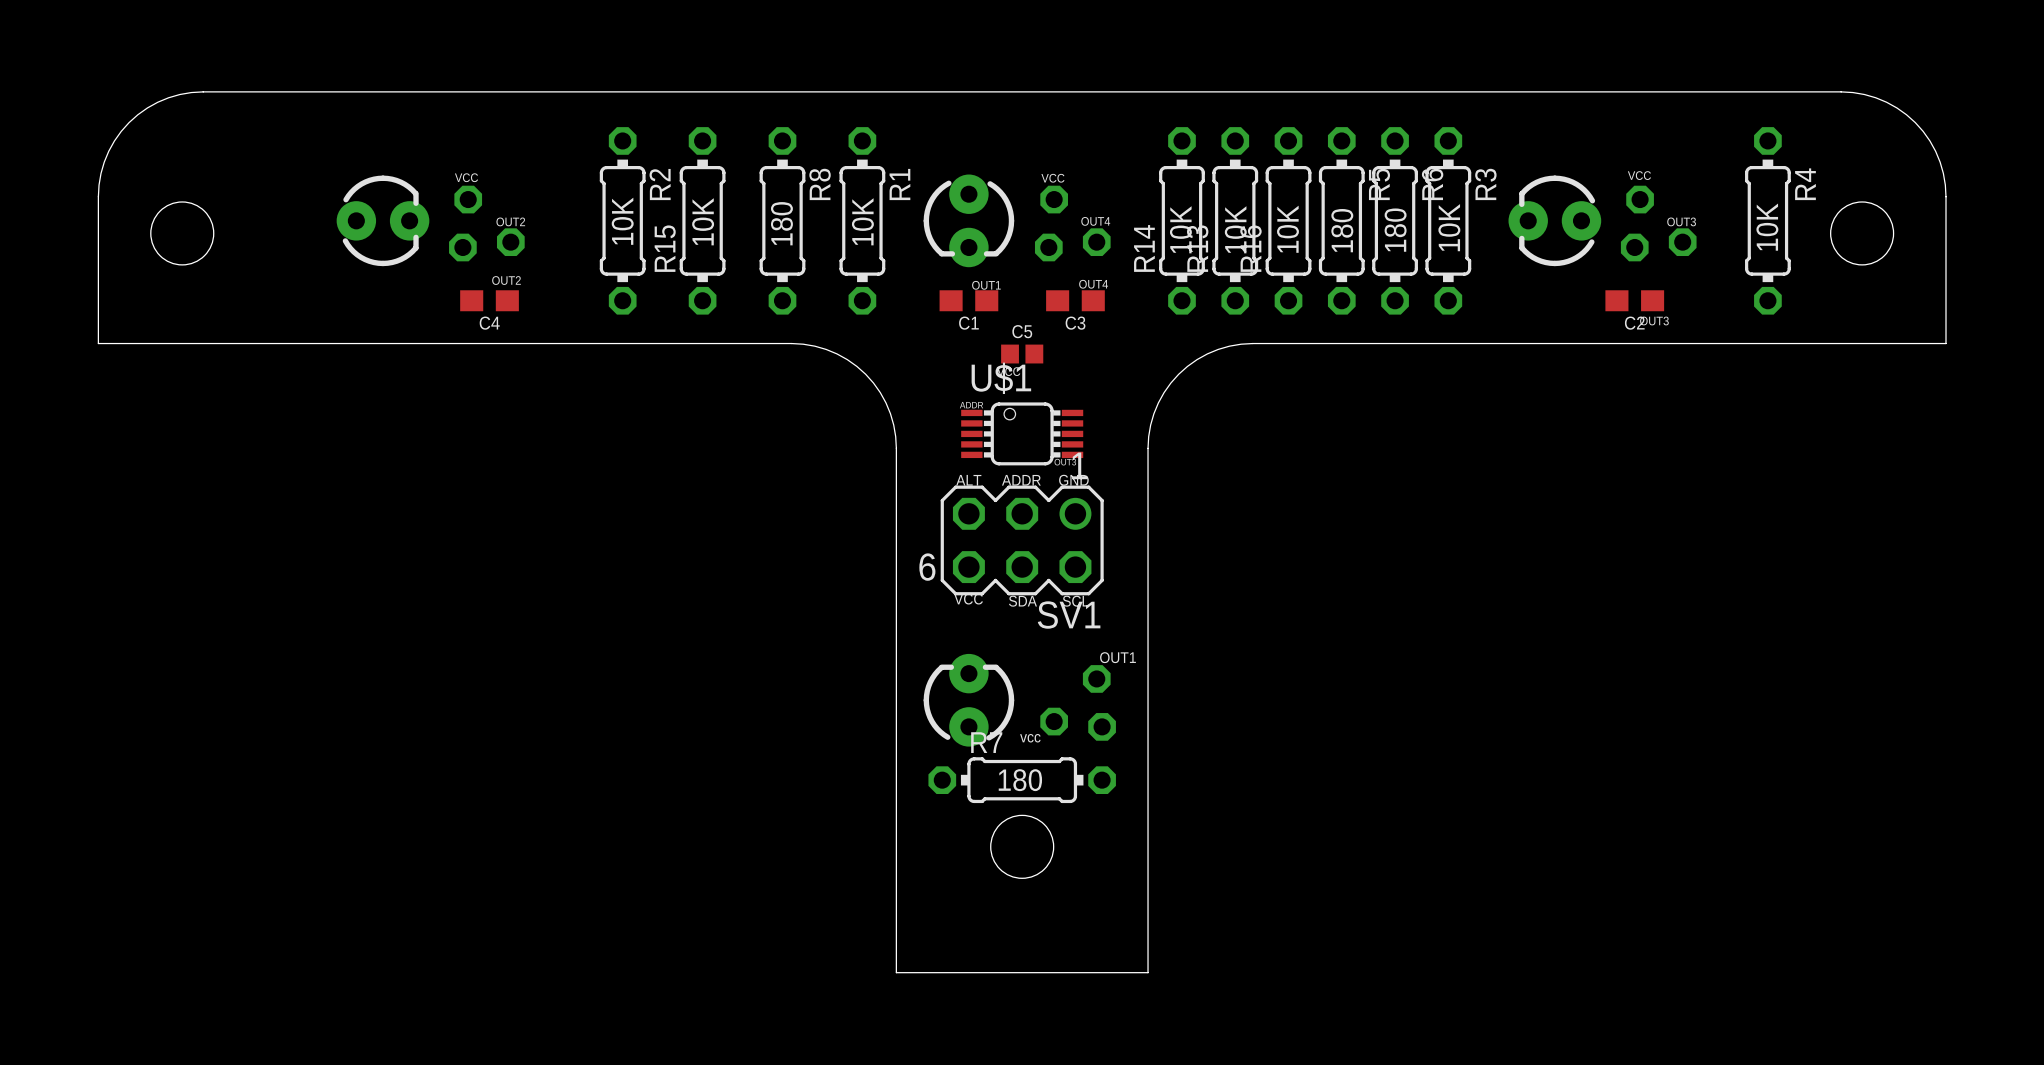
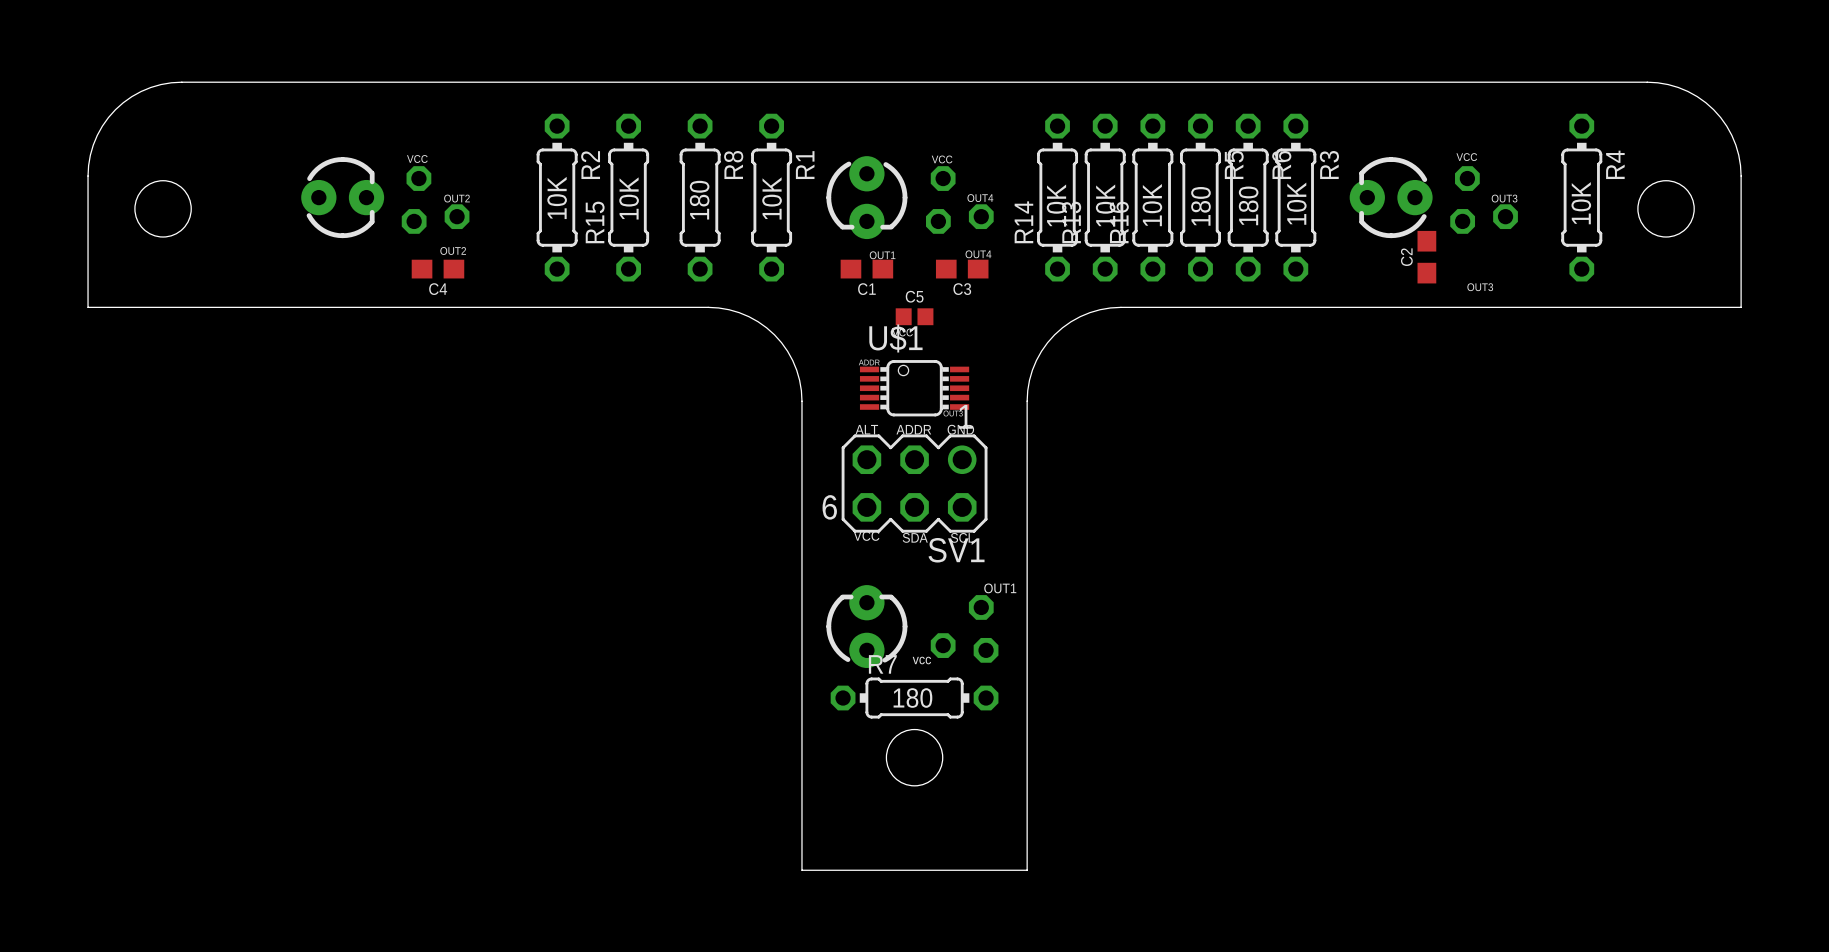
C2 rotation: 0° (1634, 300) -> 90° clockwise (1426, 257)
C2 position: (1634, 300) -> (1426, 257)

